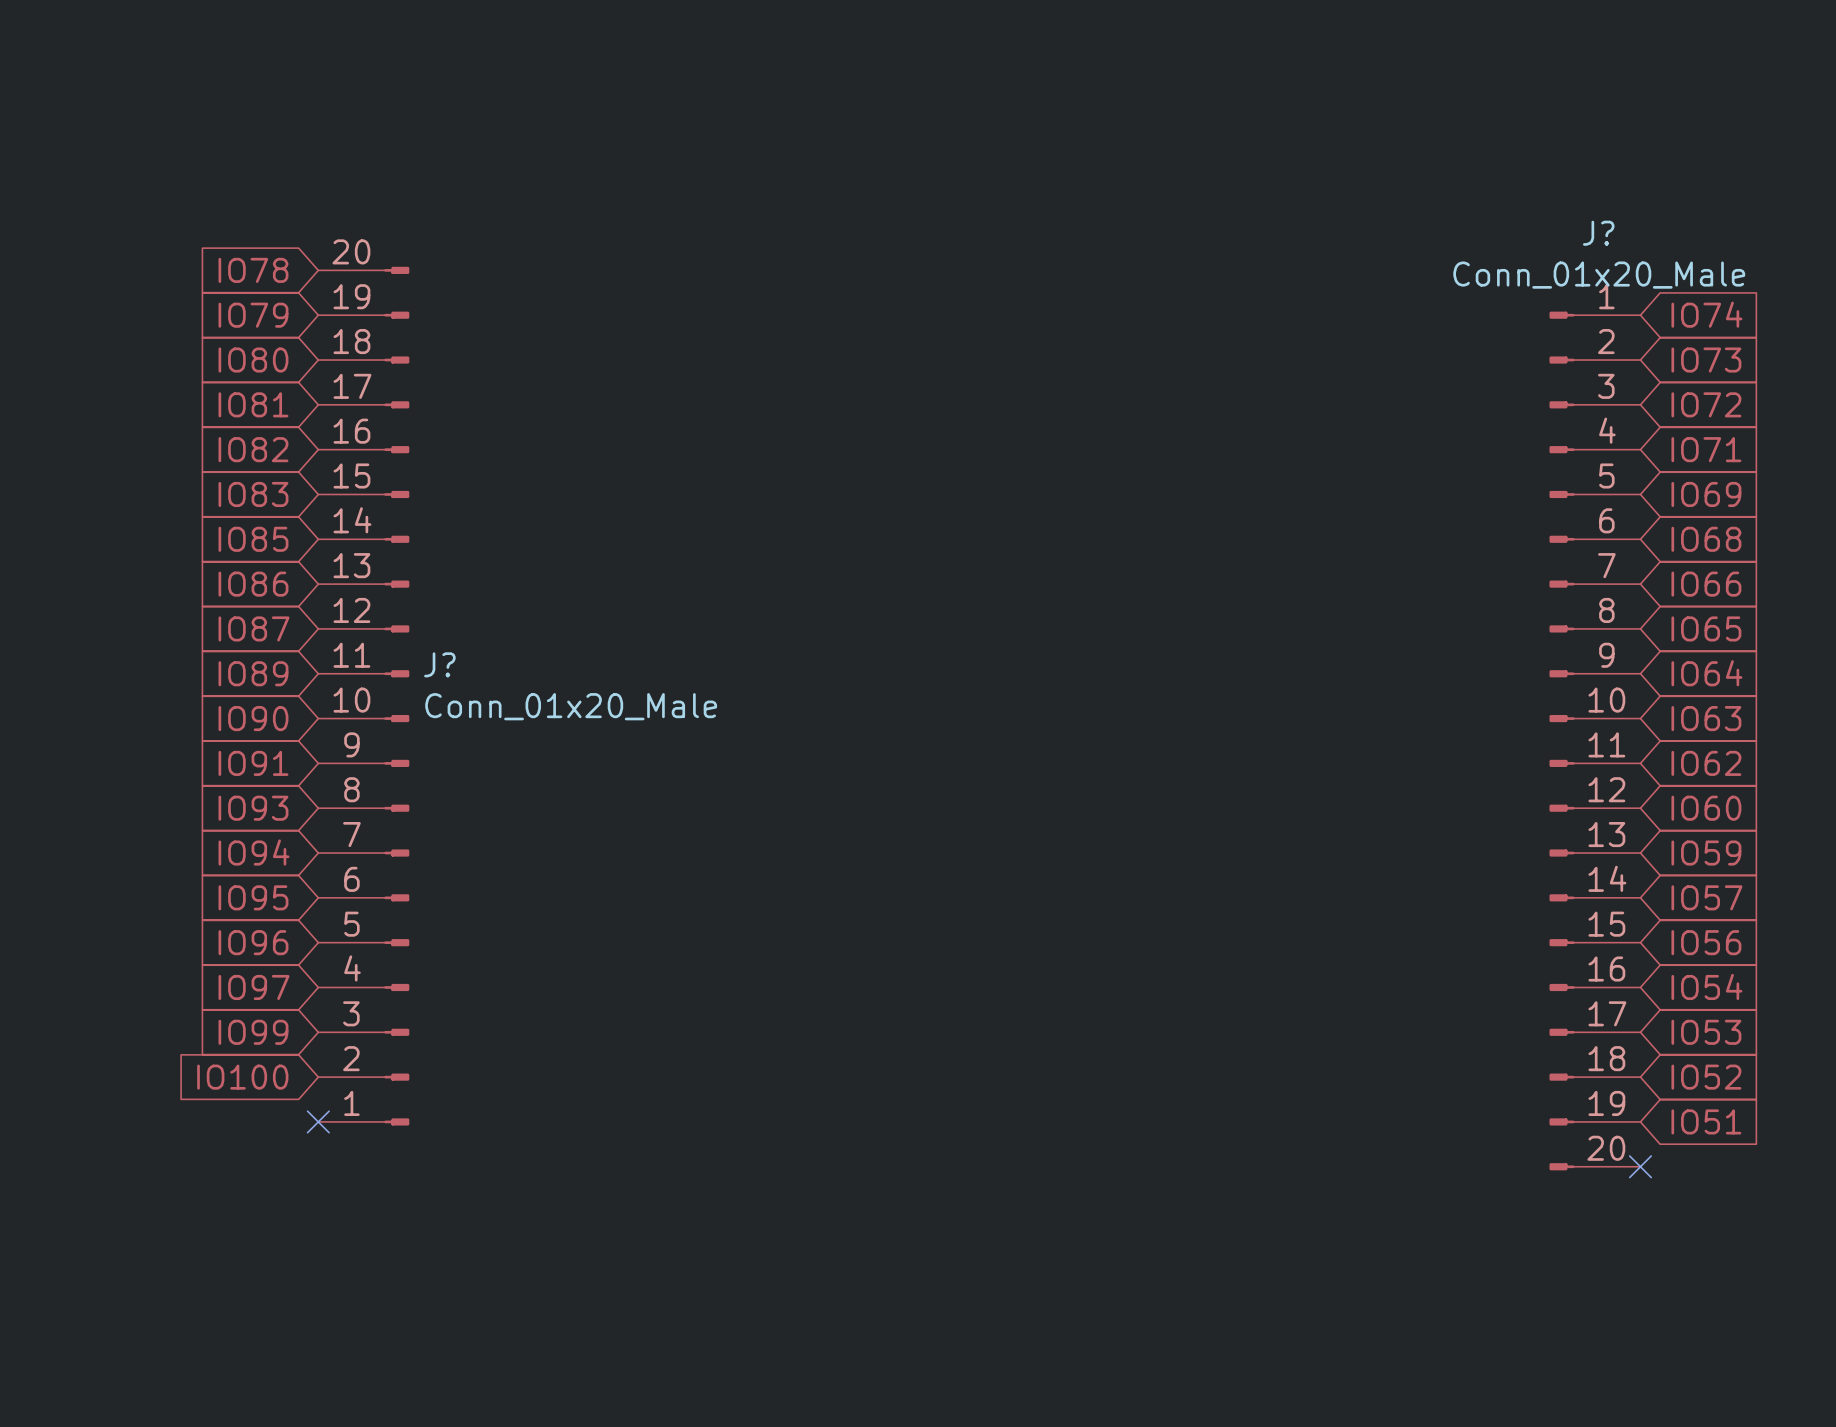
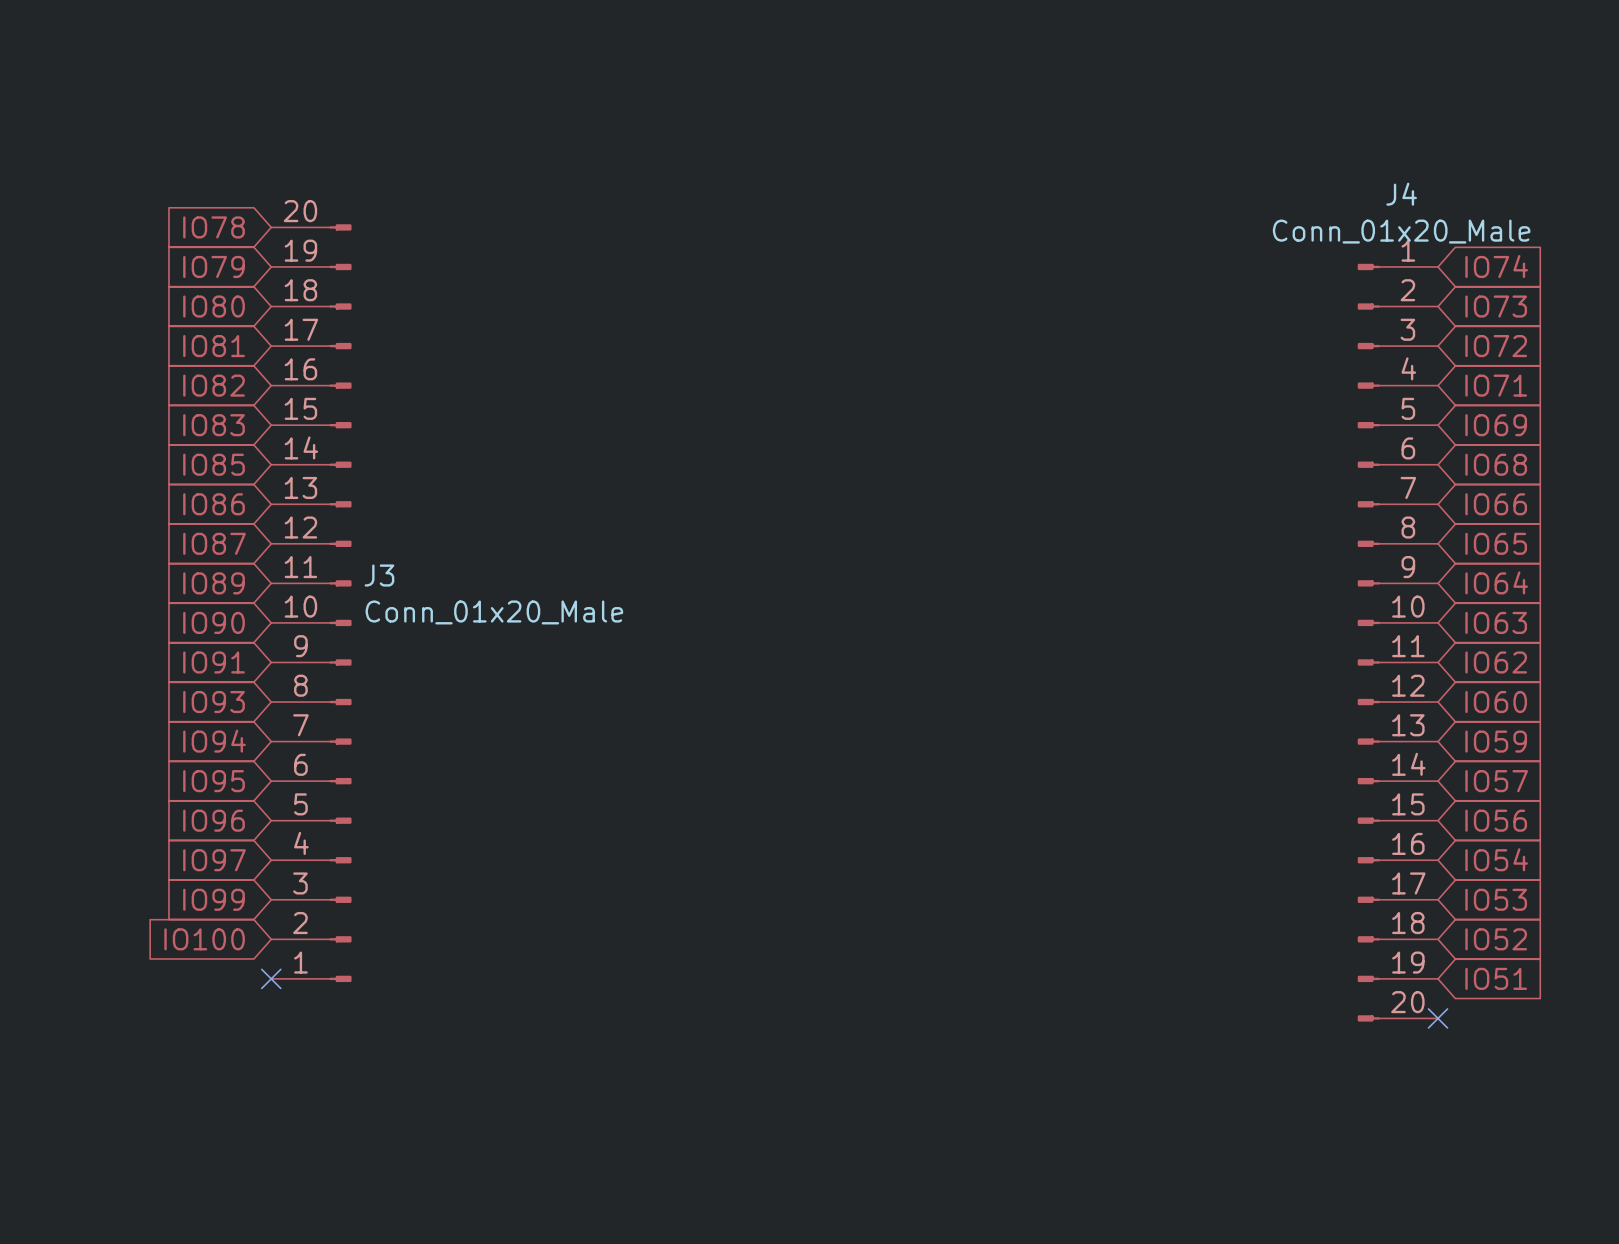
J? name: J? (1598, 233) -> J4 (1401, 194)
J? name: J? (439, 664) -> J3 (379, 575)

